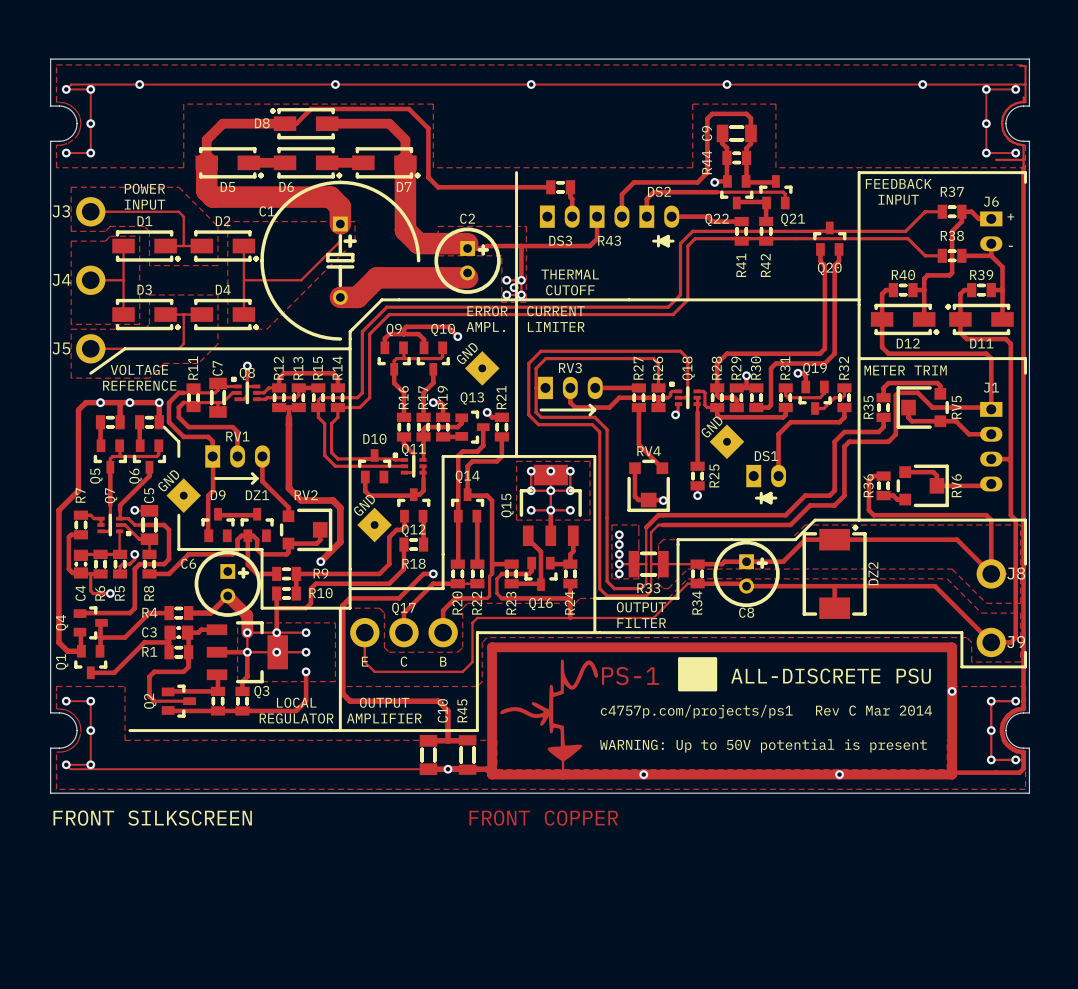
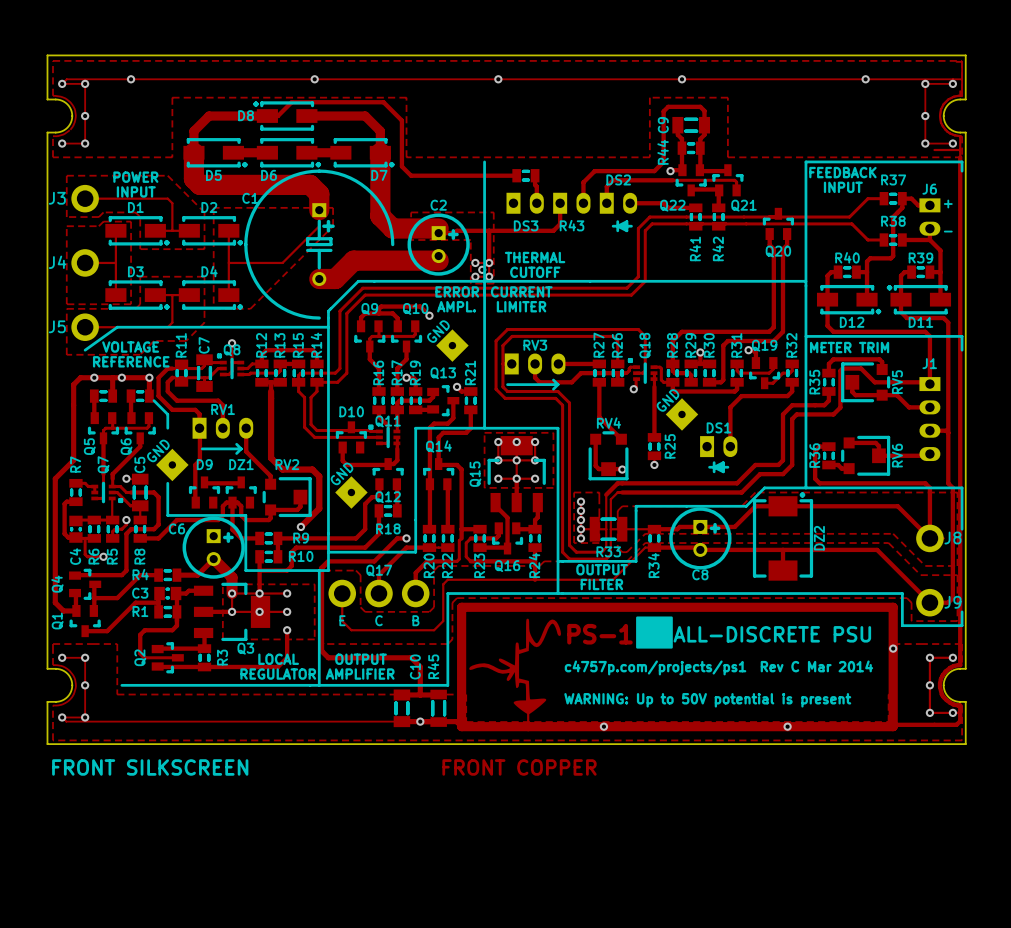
track: (247, 652) (247, 676) (242, 681) (242, 691) -> none
R3 name: none -> R3 (222, 657)
part: (242, 701) -> none

